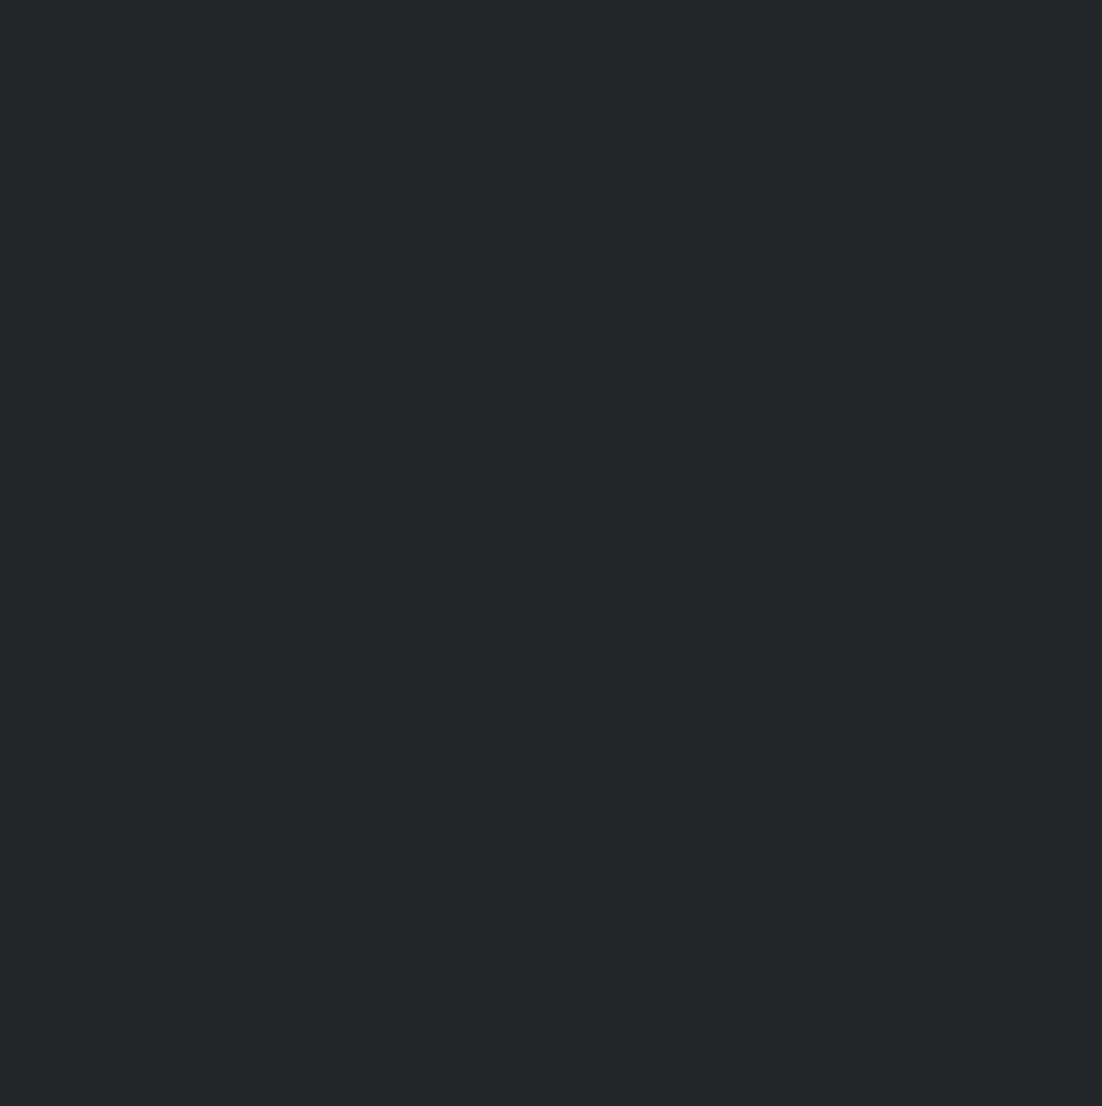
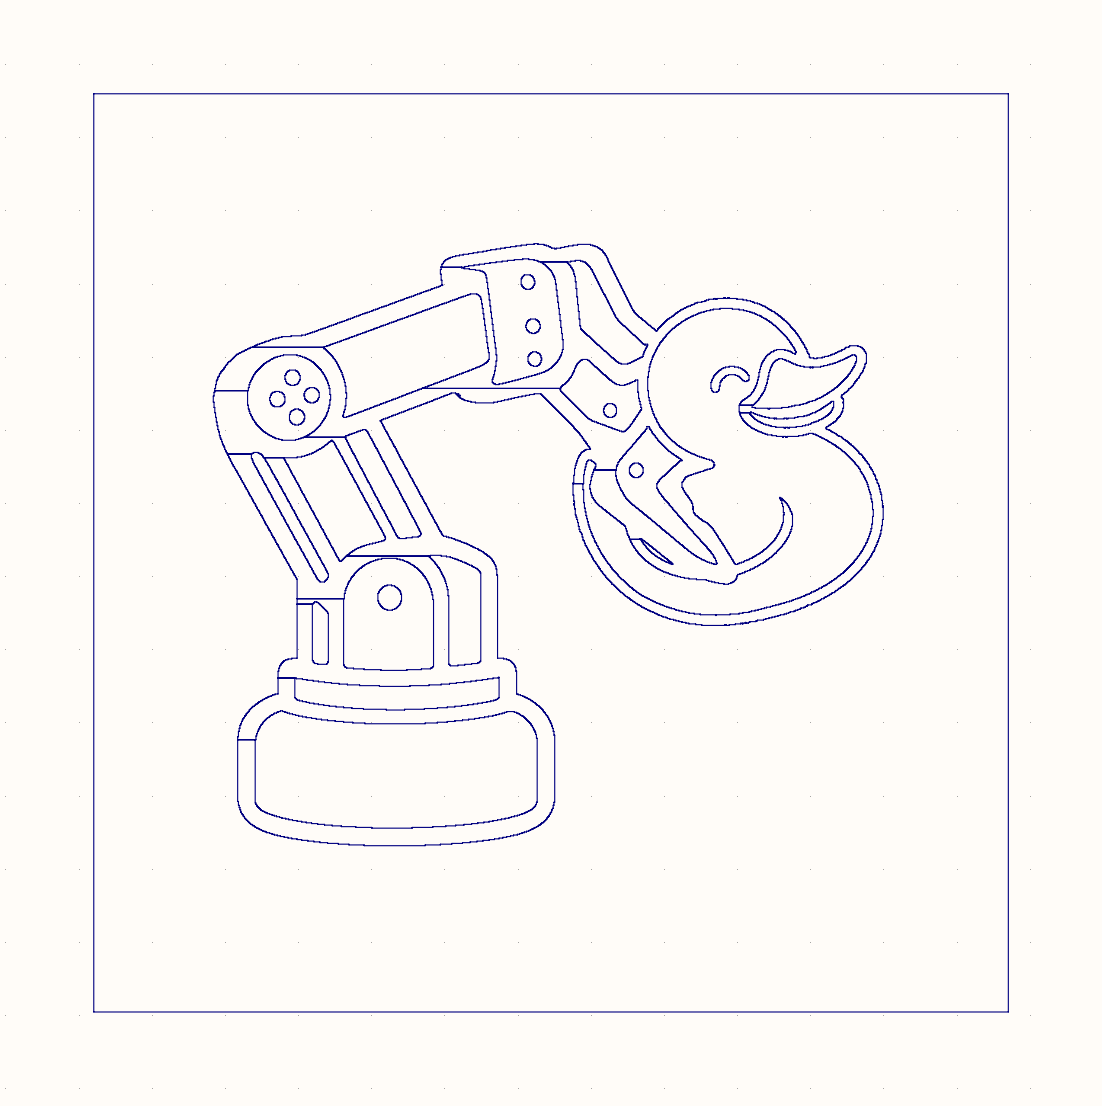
line: none -> (93, 93) (1008, 93) (1008, 1011) (93, 1011) (93, 93)
line: none -> (540, 261) (551, 271) (555, 279) (563, 339) (561, 354) (556, 362) (544, 372) (499, 384) (492, 382) (496, 354) (486, 274) (480, 270) (461, 267)
line: none -> (566, 261) (566, 262) (568, 263) (568, 264) (570, 265) (570, 267) (572, 267) (575, 276) (580, 328) (618, 363) (627, 364) (642, 357) (647, 344) (643, 344) (617, 320) (592, 269) (585, 261) (580, 260) (538, 261) (522, 258) (464, 267) (441, 267)
line: none -> (524, 274) (530, 274) (534, 278) (534, 284) (530, 289) (525, 289) (521, 284) (521, 278) (524, 274)
line: none -> (530, 319) (537, 319) (540, 324) (538, 331) (534, 333) (529, 332) (525, 327) (527, 321) (530, 319)
line: none -> (252, 347) (281, 336) (305, 335) (442, 285) (440, 274) (441, 264) (445, 259) (452, 256) (534, 243) (544, 244) (554, 248) (577, 244) (590, 244) (601, 249) (606, 255) (633, 312) (656, 331) (667, 319) (688, 306) (708, 299) (729, 297) (750, 300) (774, 311) (795, 331) (810, 357) (828, 356) (849, 345) (858, 345) (864, 349) (866, 353) (866, 363) (863, 370) (853, 385) (842, 394) (843, 408) (840, 415) (826, 428) (851, 444) (862, 455) (875, 476) (883, 505) (882, 525) (878, 540) (865, 564) (849, 581) (823, 598) (794, 611) (763, 620) (729, 625) (688, 623) (662, 617) (637, 604) (611, 584) (593, 560) (585, 545) (575, 514) (573, 482) (574, 468) (579, 455) (584, 450) (590, 448) (573, 426) (540, 393) (493, 402) (470, 402) (458, 396)
line: none -> (323, 347) (336, 361) (344, 379) (346, 398) (343, 417) (421, 388) (560, 388) (571, 376) (576, 364) (582, 359) (589, 360) (616, 384) (624, 385) (637, 380) (638, 398) (641, 409) (630, 426) (621, 431) (588, 418) (560, 391) (560, 389) (560, 389) (560, 388)
line: none -> (532, 351) (539, 353) (541, 357) (540, 364) (537, 366) (531, 365) (528, 361) (528, 356) (532, 351)
line: none -> (729, 366) (721, 368) (713, 375) (710, 382) (713, 392) (718, 391) (720, 382) (726, 375) (735, 374) (744, 381) (749, 380) (749, 375) (744, 370) (729, 366)
line: none -> (289, 370) (284, 375) (286, 383) (290, 385) (297, 384) (300, 380) (298, 372) (289, 370)
line: none -> (309, 387) (314, 387) (319, 392) (317, 400) (313, 402) (307, 402) (304, 399) (304, 391) (309, 387)
line: none -> (422, 388) (479, 367) (488, 360) (489, 352) (483, 308) (478, 294) (470, 293) (458, 297) (324, 347) (250, 347) (236, 354) (227, 362) (217, 376) (213, 402) (219, 435) (226, 453) (258, 452) (263, 457) (297, 457) (316, 451) (331, 440) (334, 442) (385, 537) (383, 540) (358, 547) (346, 556)
line: none -> (214, 390) (248, 390) (249, 382) (255, 372) (264, 363) (277, 356) (297, 354) (310, 360) (321, 370) (326, 379) (330, 399) (328, 411) (320, 424) (304, 437)
line: none -> (247, 390) (247, 405) (252, 419) (263, 431) (275, 438) (295, 440) (303, 437) (345, 437) (365, 429) (413, 517) (421, 533) (419, 536) (397, 537) (397, 536) (396, 535) (390, 521) (382, 509) (377, 497) (375, 496) (369, 482) (367, 482) (361, 468) (360, 467) (359, 464) (352, 453) (352, 451) (351, 451) (351, 450) (351, 450) (351, 448) (350, 448) (350, 447) (349, 447) (349, 445) (348, 445) (348, 444) (348, 444) (348, 442) (347, 442) (347, 441) (346, 441) (346, 439) (345, 439) (345, 437) (345, 437) (345, 437)
line: none -> (275, 391) (284, 394) (284, 402) (280, 406) (274, 406) (270, 402) (270, 395) (275, 391)
line: none -> (457, 394) (459, 396)
line: none -> (457, 394) (451, 392) (380, 421) (441, 534) (477, 548) (493, 561) (497, 575) (497, 658) (508, 659) (514, 664) (516, 671) (516, 694) (530, 699) (538, 705) (547, 716) (553, 728) (554, 735) (553, 808) (547, 819) (540, 825) (517, 835) (489, 840) (440, 844) (348, 844) (301, 840) (274, 835) (255, 827) (244, 818) (237, 801) (238, 731) (242, 718) (252, 706) (268, 696) (278, 694) (278, 671) (281, 663) (287, 658) (297, 658) (297, 578) (227, 453)
line: none -> (607, 403) (603, 408) (604, 414) (608, 417) (612, 417) (616, 413) (616, 407) (612, 403) (607, 403)
line: none -> (739, 405) (740, 402) (753, 391) (761, 364) (768, 354) (776, 349) (784, 349) (795, 354) (796, 351) (787, 337) (774, 325) (761, 316) (749, 311) (732, 308) (713, 309) (698, 312) (672, 328) (659, 342) (652, 357) (647, 376) (648, 397) (656, 421) (672, 441) (685, 450) (713, 462) (712, 468) (688, 475) (681, 482) (681, 487) (692, 503) (693, 512) (713, 528) (733, 562) (737, 564) (762, 552) (776, 537) (781, 527) (784, 514) (783, 506) (782, 506) (781, 500) (780, 499) (780, 497) (787, 503) (792, 514) (791, 529) (782, 546) (762, 563) (737, 574) (733, 581) (723, 584) (706, 579) (680, 577) (663, 572) (646, 561) (635, 549) (630, 539)
line: none -> (752, 405) (752, 407) (755, 408) (781, 408) (815, 400) (833, 389) (848, 376) (854, 365) (856, 356) (851, 354) (835, 363) (813, 367) (797, 365) (778, 358) (770, 367) (765, 389) (758, 399) (753, 405) (739, 405) (739, 412) (742, 420) (758, 431) (782, 437) (813, 433) (835, 444) (854, 462) (867, 482) (872, 501) (873, 516) (870, 531) (865, 545) (854, 562) (842, 573) (809, 594) (770, 607) (730, 614) (688, 613) (656, 603) (630, 587) (611, 569) (601, 553) (588, 524) (583, 502) (582, 483)
line: none -> (294, 408) (290, 412) (289, 420) (292, 424) (298, 424) (303, 421) (304, 415) (301, 410) (294, 408)
line: none -> (739, 412) (751, 412) (774, 418) (794, 418) (815, 412) (833, 401) (833, 407) (827, 415) (802, 426) (789, 428) (771, 426) (757, 421) (749, 412)
line: none -> (251, 453) (255, 466) (316, 578) (319, 581) (324, 581) (328, 577) (328, 573) (264, 457)
line: none -> (284, 457) (339, 561) (345, 556) (441, 555) (464, 562) (480, 571) (480, 661) (477, 663) (457, 665) (448, 664) (448, 589) (439, 568) (428, 556)
line: none -> (633, 463) (629, 467) (629, 473) (632, 476) (638, 477) (643, 473) (643, 467) (638, 463) (633, 463)
line: none -> (594, 469) (595, 463) (588, 460) (584, 469) (583, 483) (573, 483)
line: none -> (615, 469) (615, 476) (616, 479) (619, 487) (632, 505) (691, 553) (707, 562) (717, 563) (710, 551) (663, 498) (656, 488) (659, 479) (681, 460) (669, 451) (657, 440) (649, 426) (646, 426) (645, 431) (619, 460) (616, 469) (593, 469) (589, 484) (590, 492) (595, 501) (625, 526) (629, 539) (640, 539) (652, 553) (672, 564) (647, 543) (641, 538) (640, 538) (640, 539)
line: none -> (387, 585) (394, 585) (401, 594) (400, 604) (392, 610) (383, 608) (377, 601) (379, 590) (387, 585)
line: none -> (297, 598) (344, 598) (348, 581) (364, 564) (381, 558) (396, 558) (406, 561) (422, 573) (431, 588) (433, 599) (433, 666) (430, 668) (406, 670) (345, 667) (343, 665) (343, 598)
line: none -> (297, 604) (313, 604) (316, 601) (328, 613) (326, 664) (314, 663) (312, 660) (312, 604)
line: none -> (278, 678) (296, 678) (347, 684) (409, 686) (449, 684) (499, 677) (499, 697) (486, 702) (437, 708) (386, 710) (343, 707) (297, 700) (294, 697) (294, 678)
line: none -> (237, 739) (255, 739) (257, 731) (262, 722) (270, 715) (280, 710) (316, 719) (364, 723) (447, 722) (514, 711) (523, 716) (531, 723) (536, 734) (537, 802) (531, 809) (508, 818) (445, 826) (371, 828) (324, 825) (288, 819) (261, 810) (255, 803) (255, 739)

